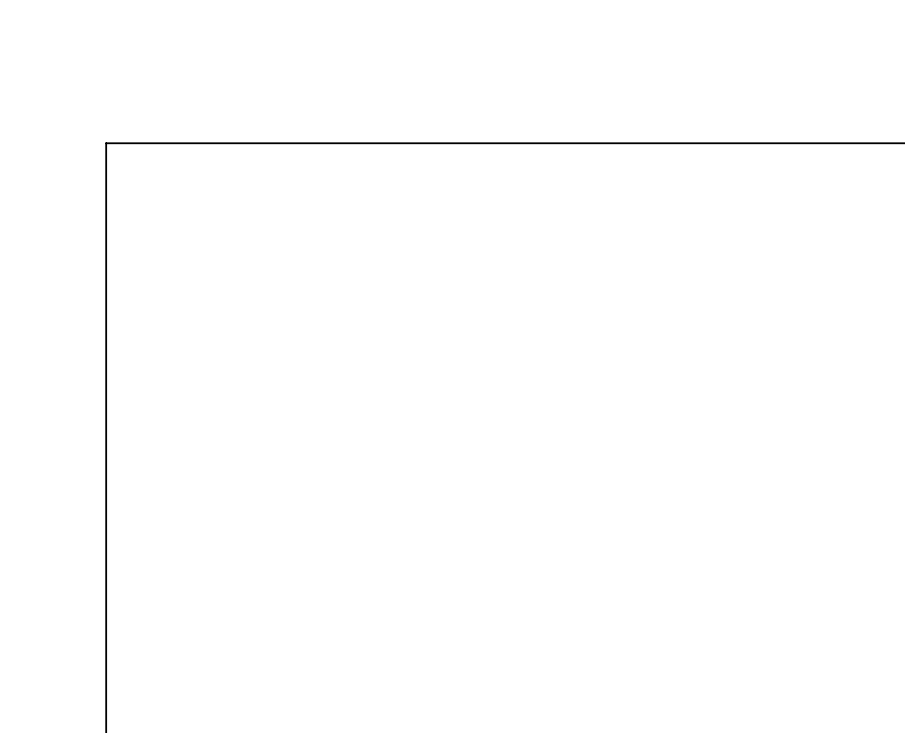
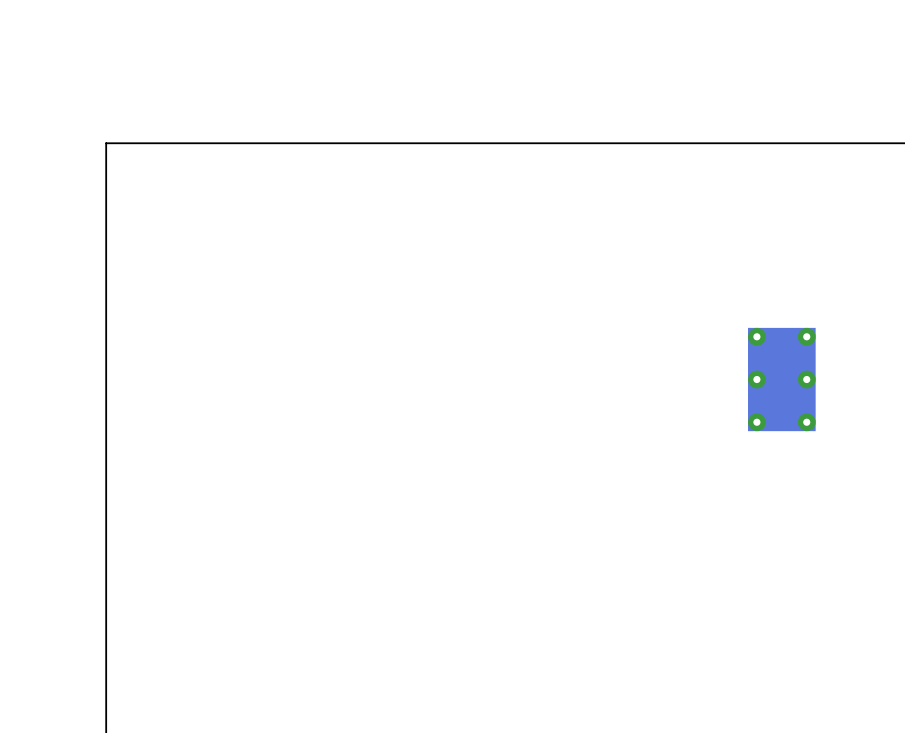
part: none -> (781, 379)

